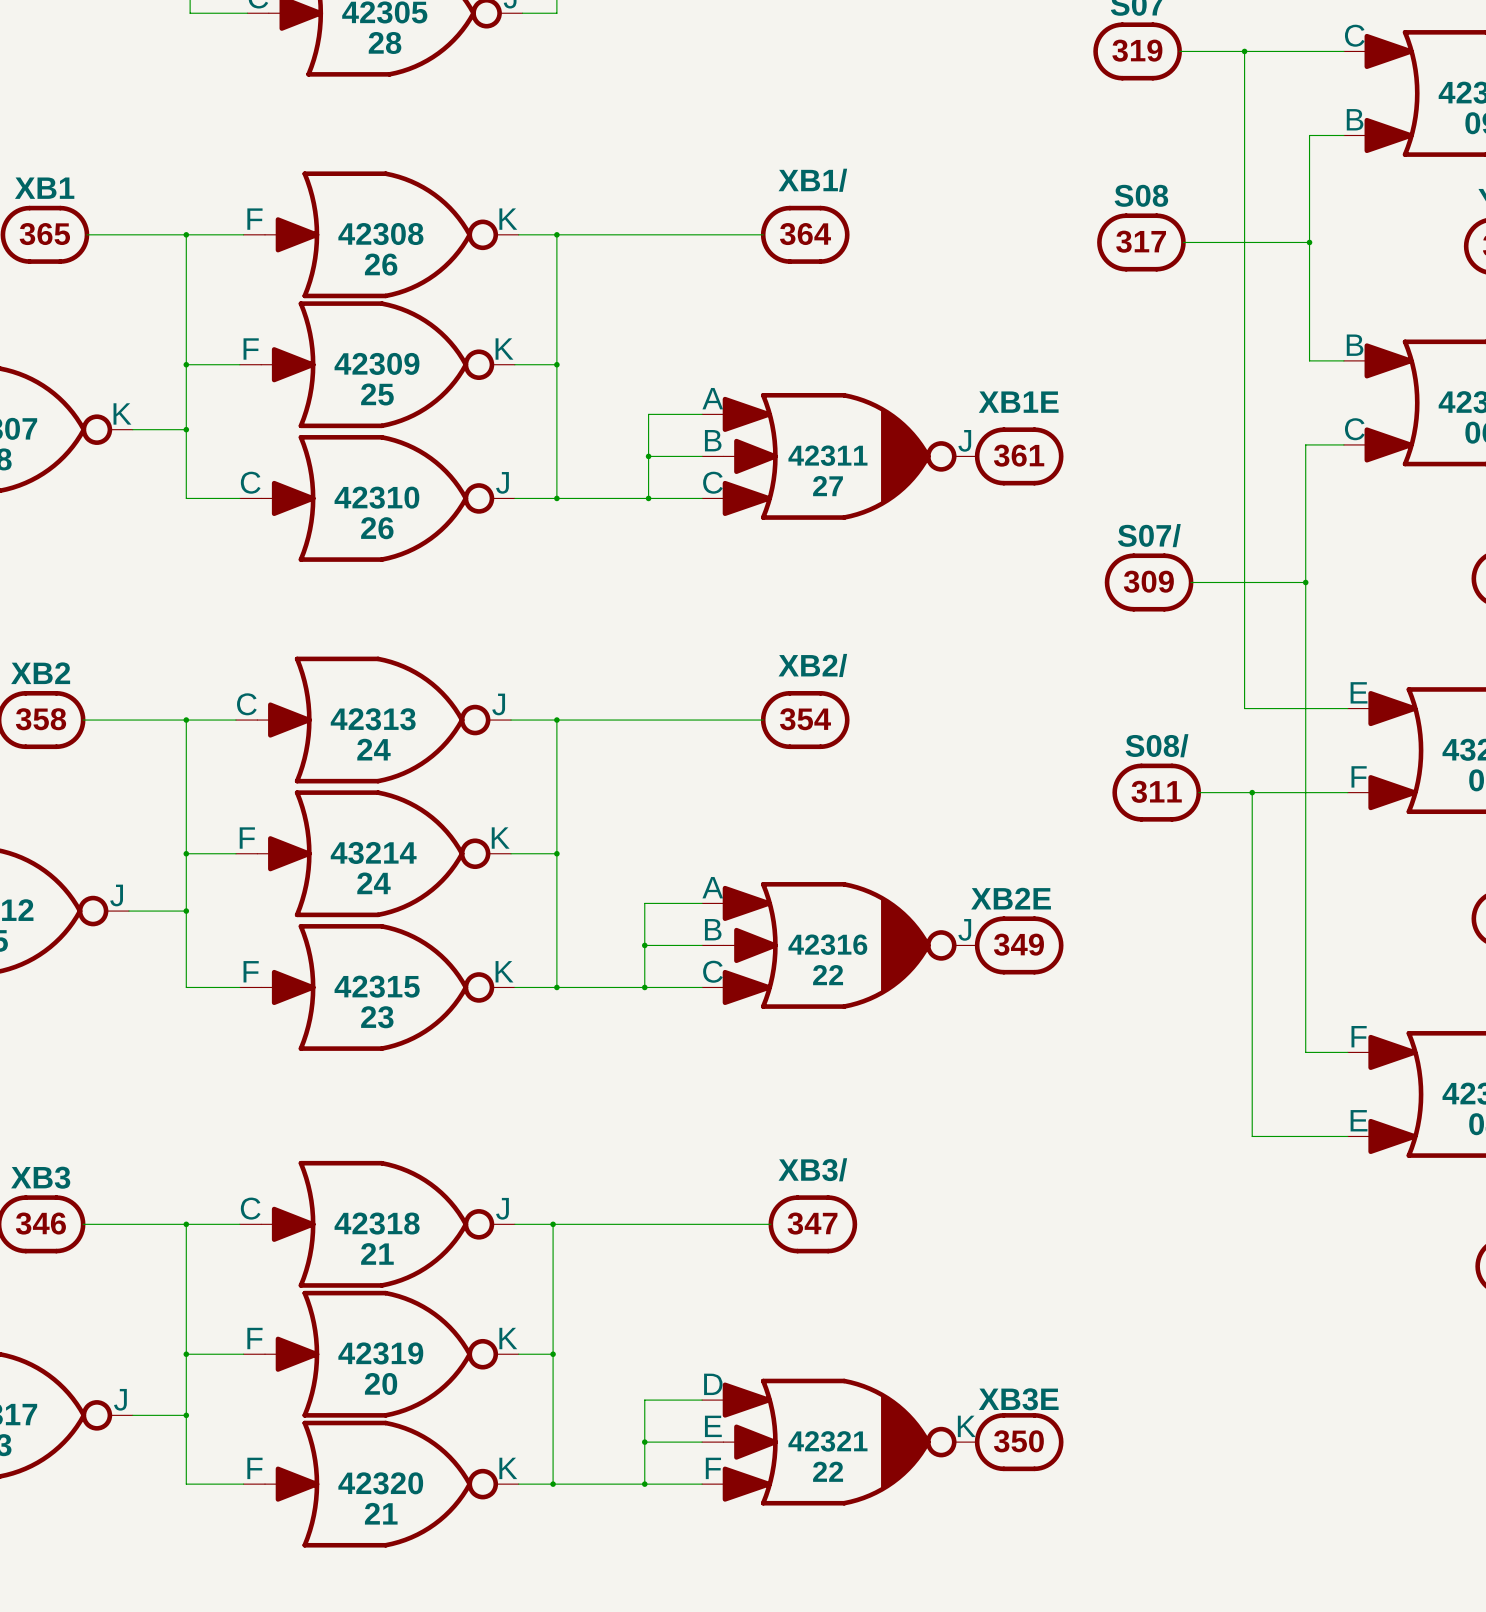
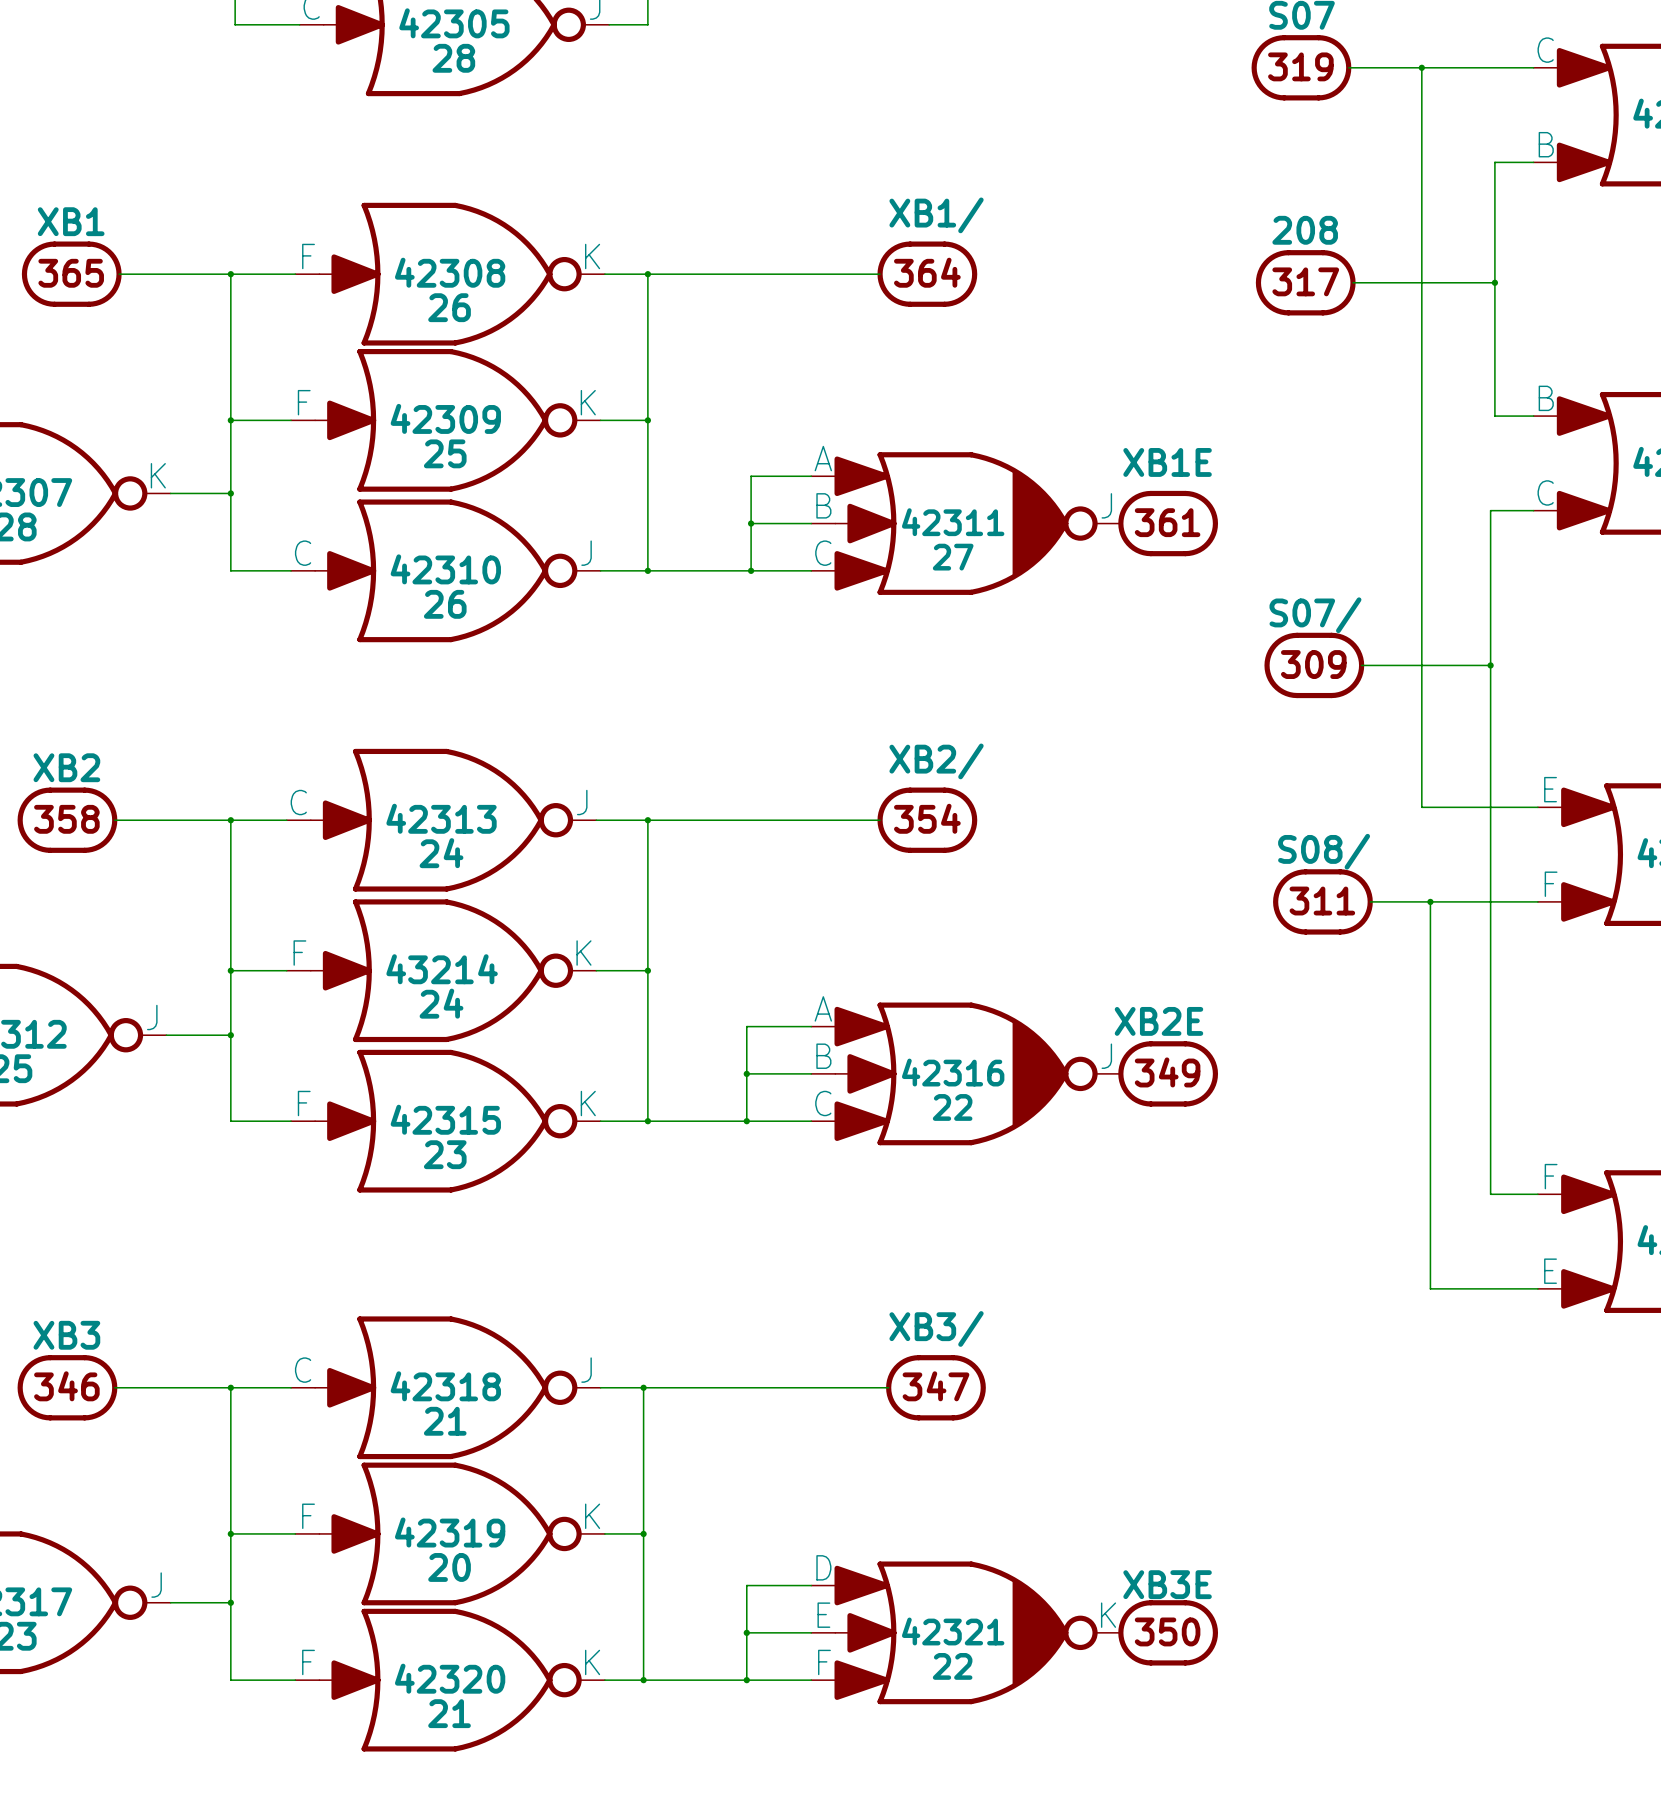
part text: S08 (1141, 195) -> 208 (1305, 230)

